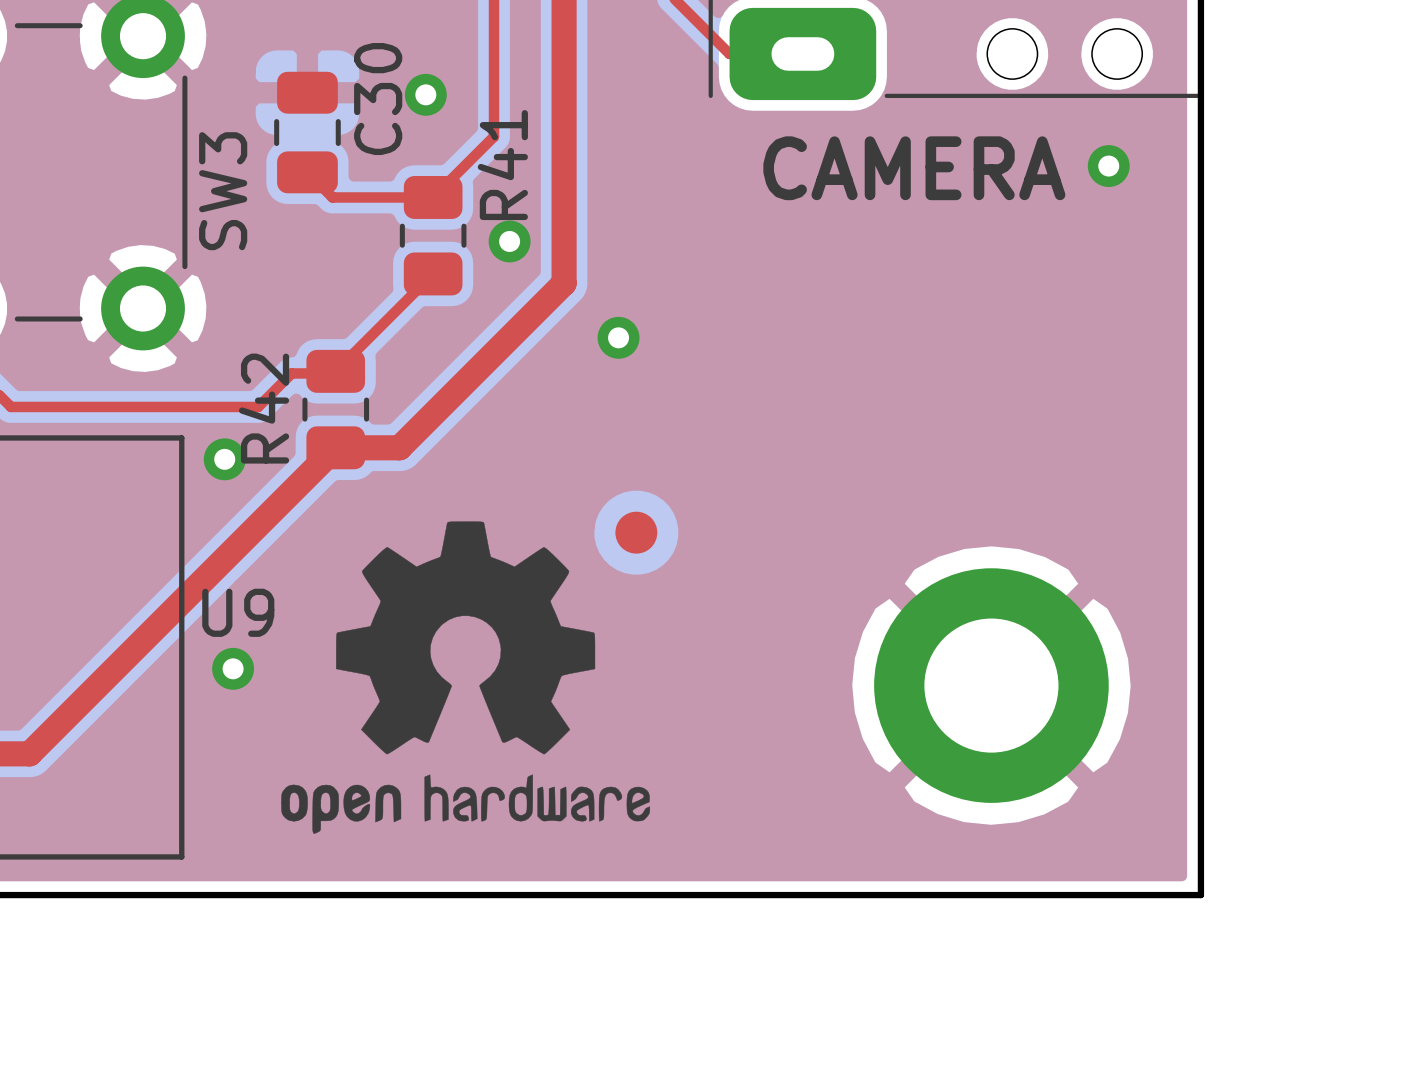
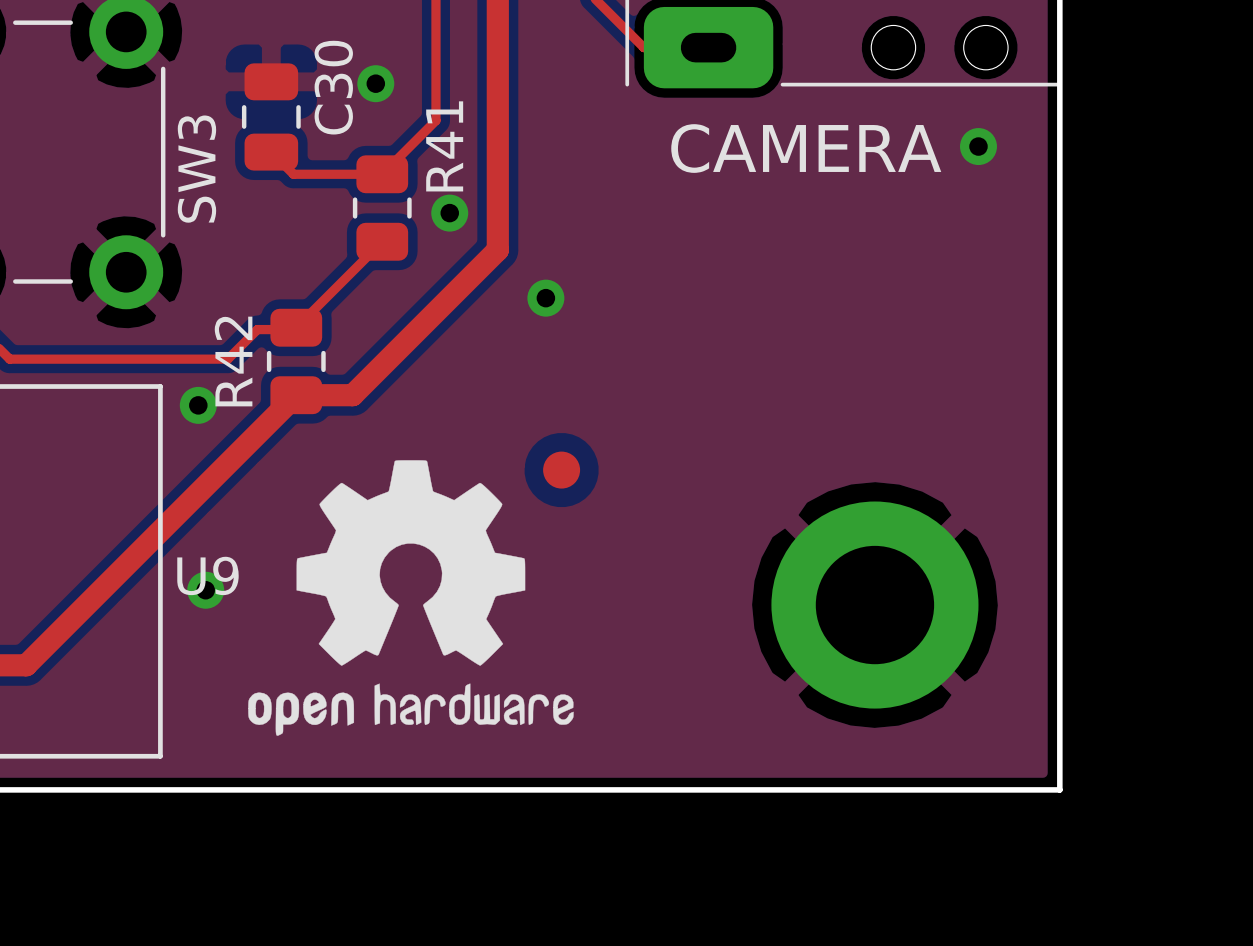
U9 name position: U9 (238, 612) -> U9 (207, 575)

